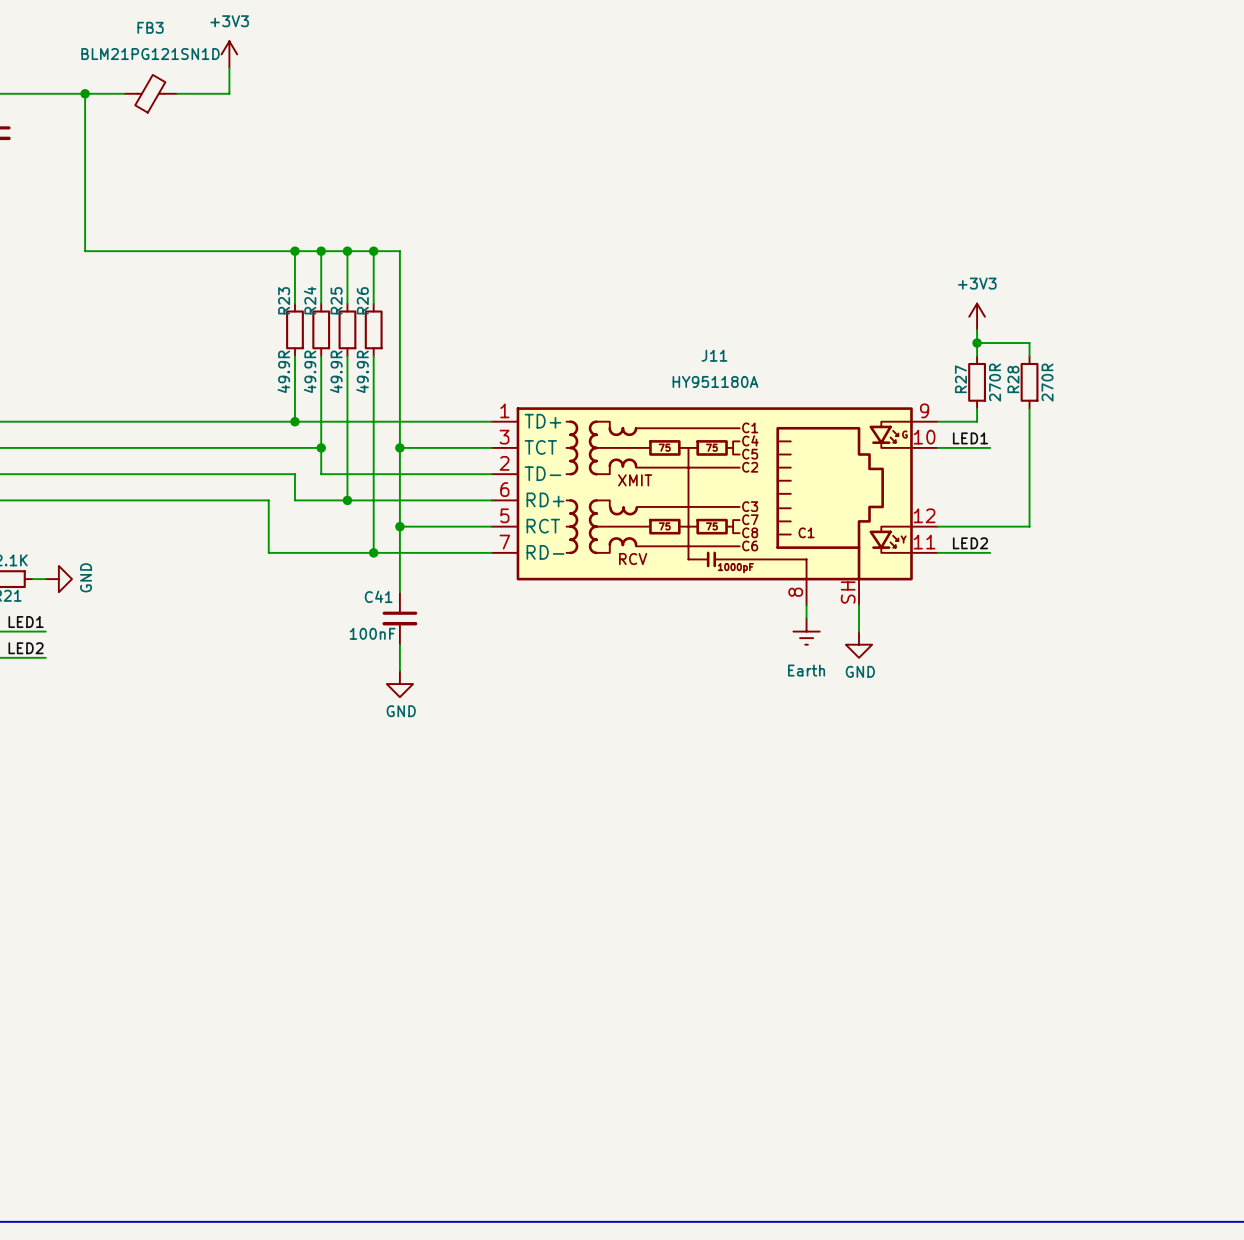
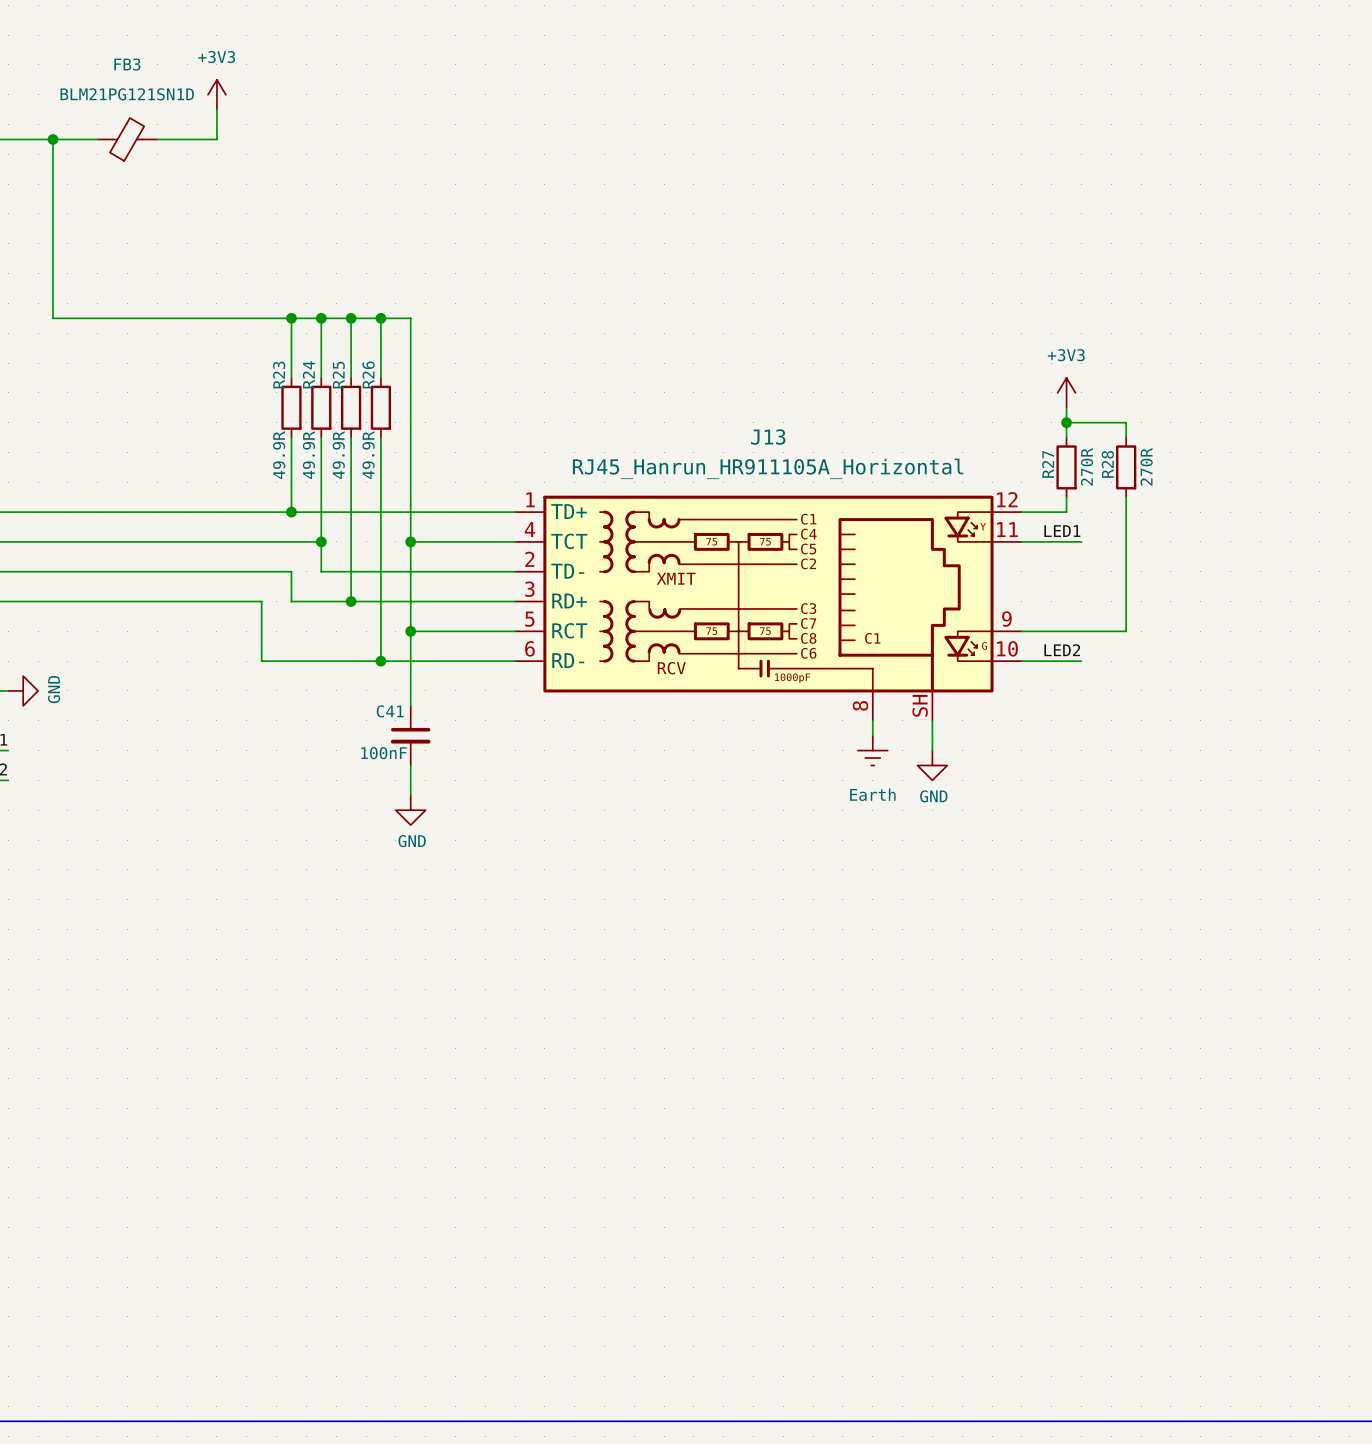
J11 name: J11 (714, 355) -> J13 (768, 437)
J11 value: HY951180A (715, 381) -> RJ45_Hanrun_HR911105A_Horizontal (768, 468)
J11 symbol: [491, 407, 938, 606] -> [515, 495, 1022, 721]

